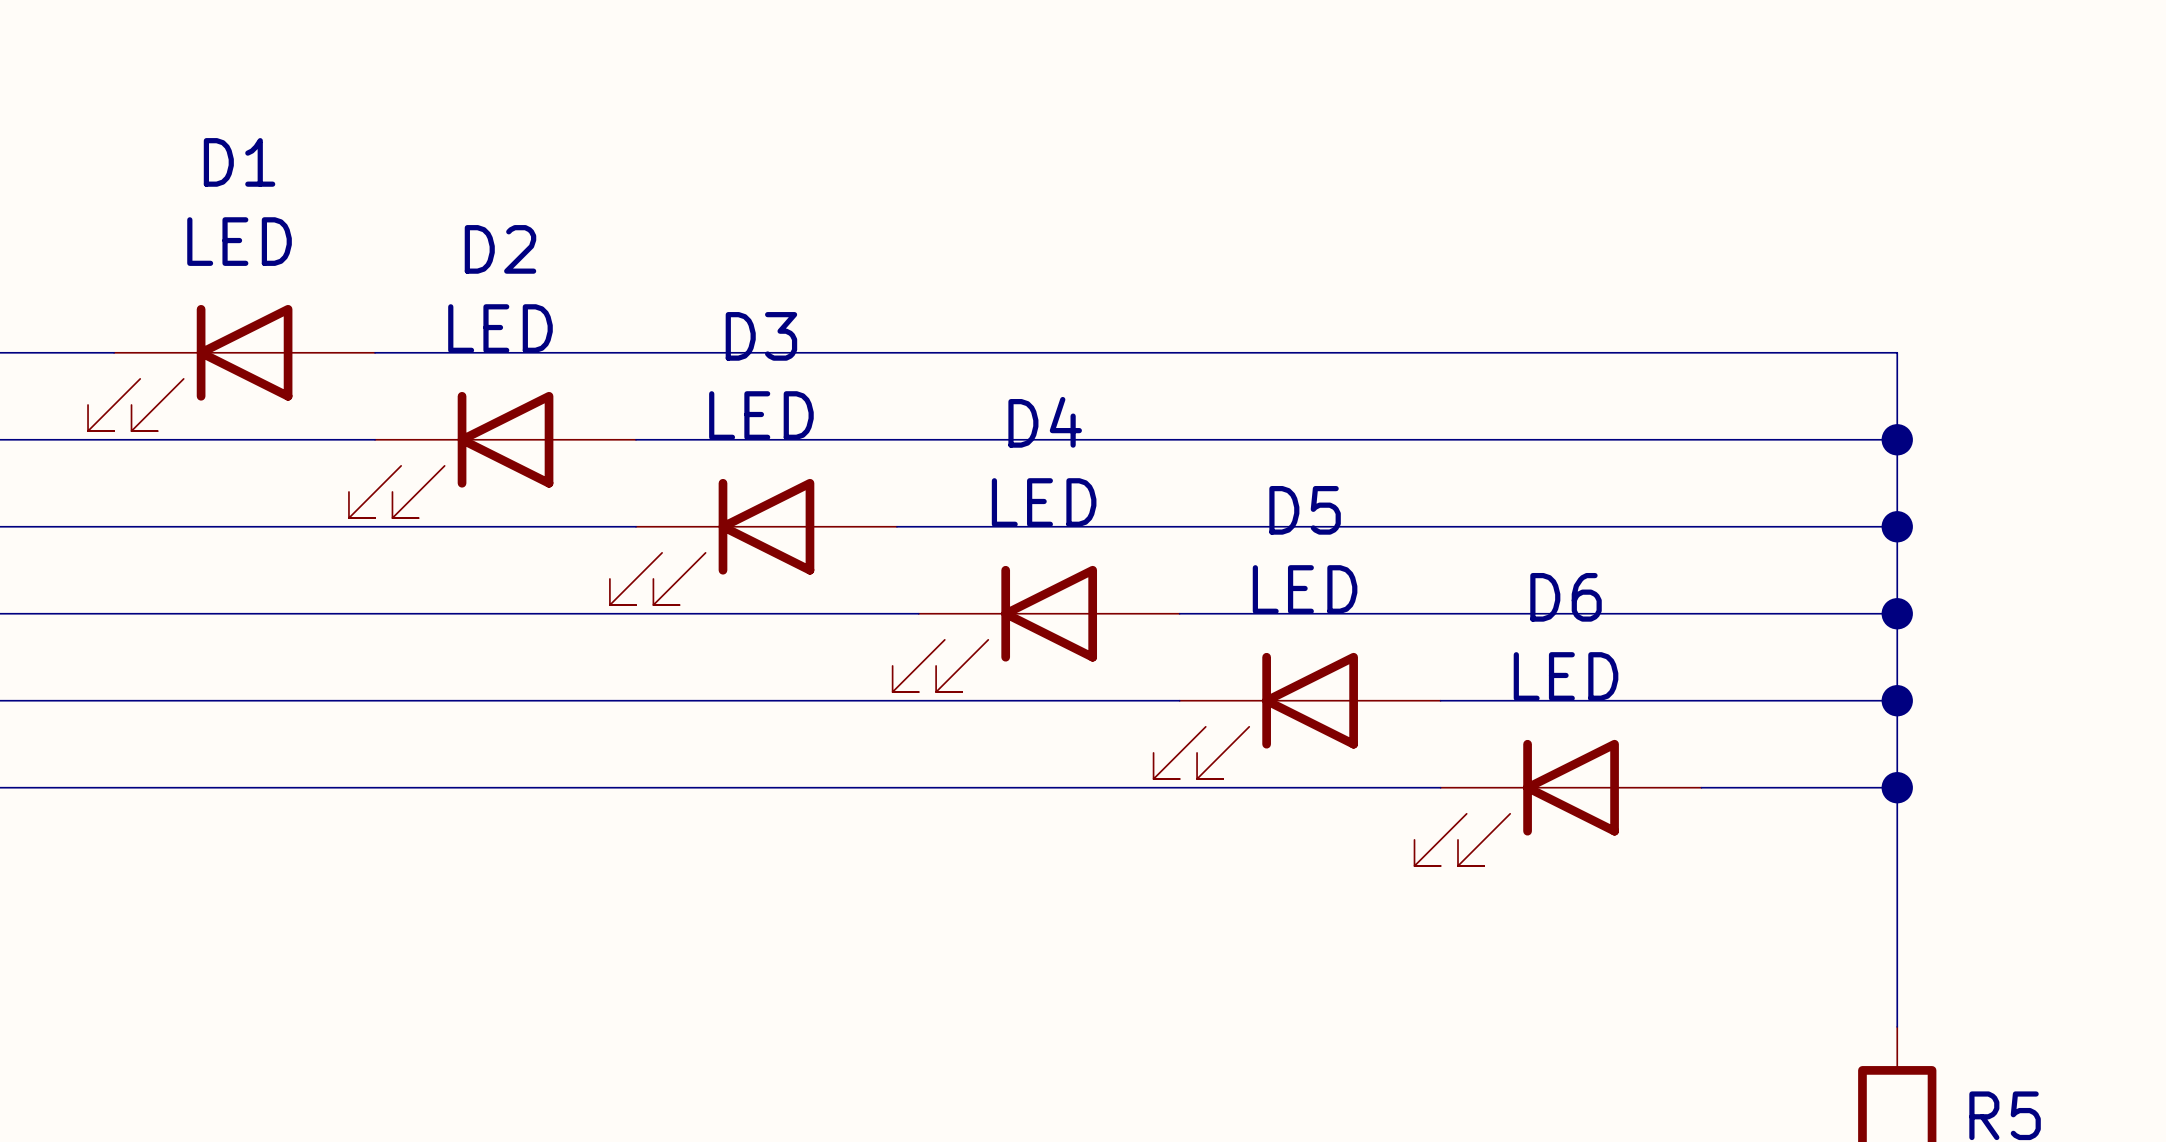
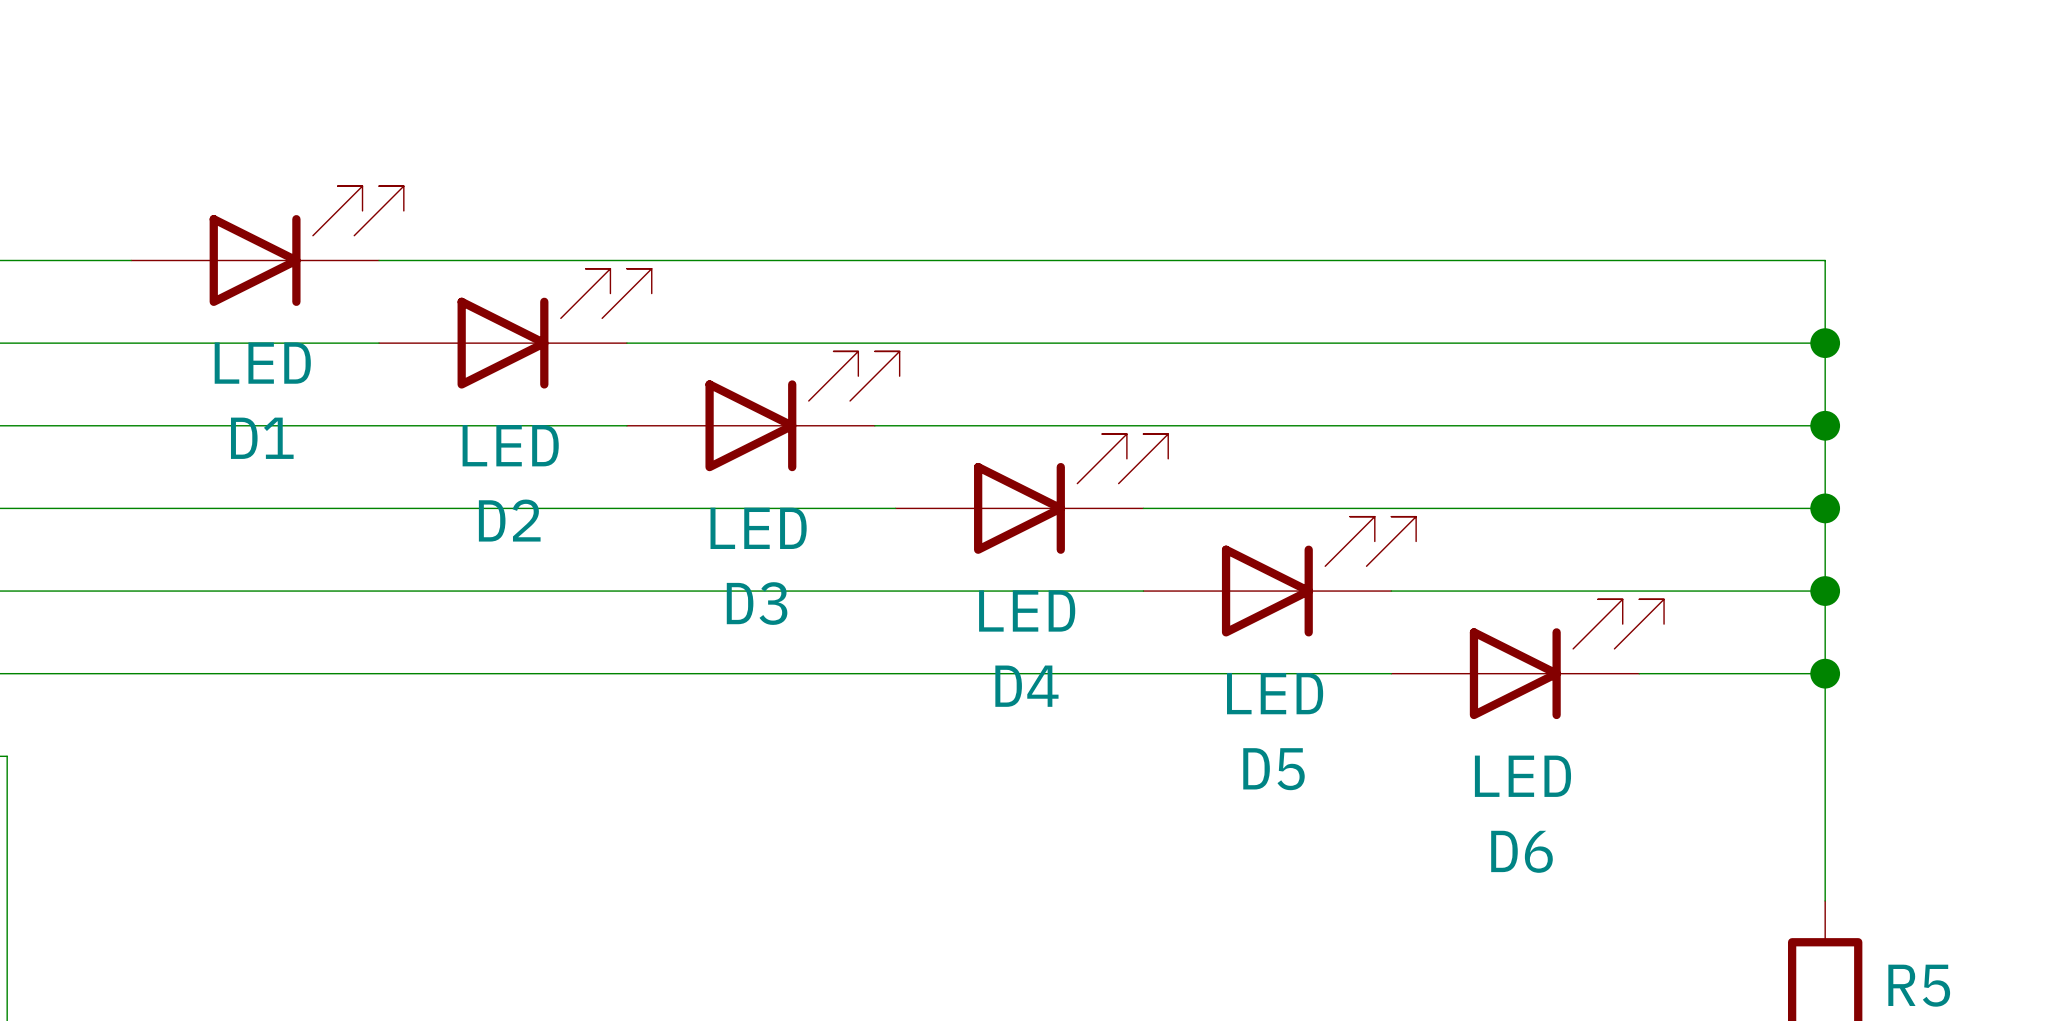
D1 rotation: 0° (190, 368) -> 180° (306, 246)
D2 rotation: 0° (451, 455) -> 180° (554, 328)
D3 rotation: 0° (712, 541) -> 180° (802, 411)
D4 rotation: 0° (994, 628) -> 180° (1071, 493)
D5 rotation: 0° (1255, 715) -> 180° (1319, 576)
D6 rotation: 0° (1516, 802) -> 180° (1566, 659)

